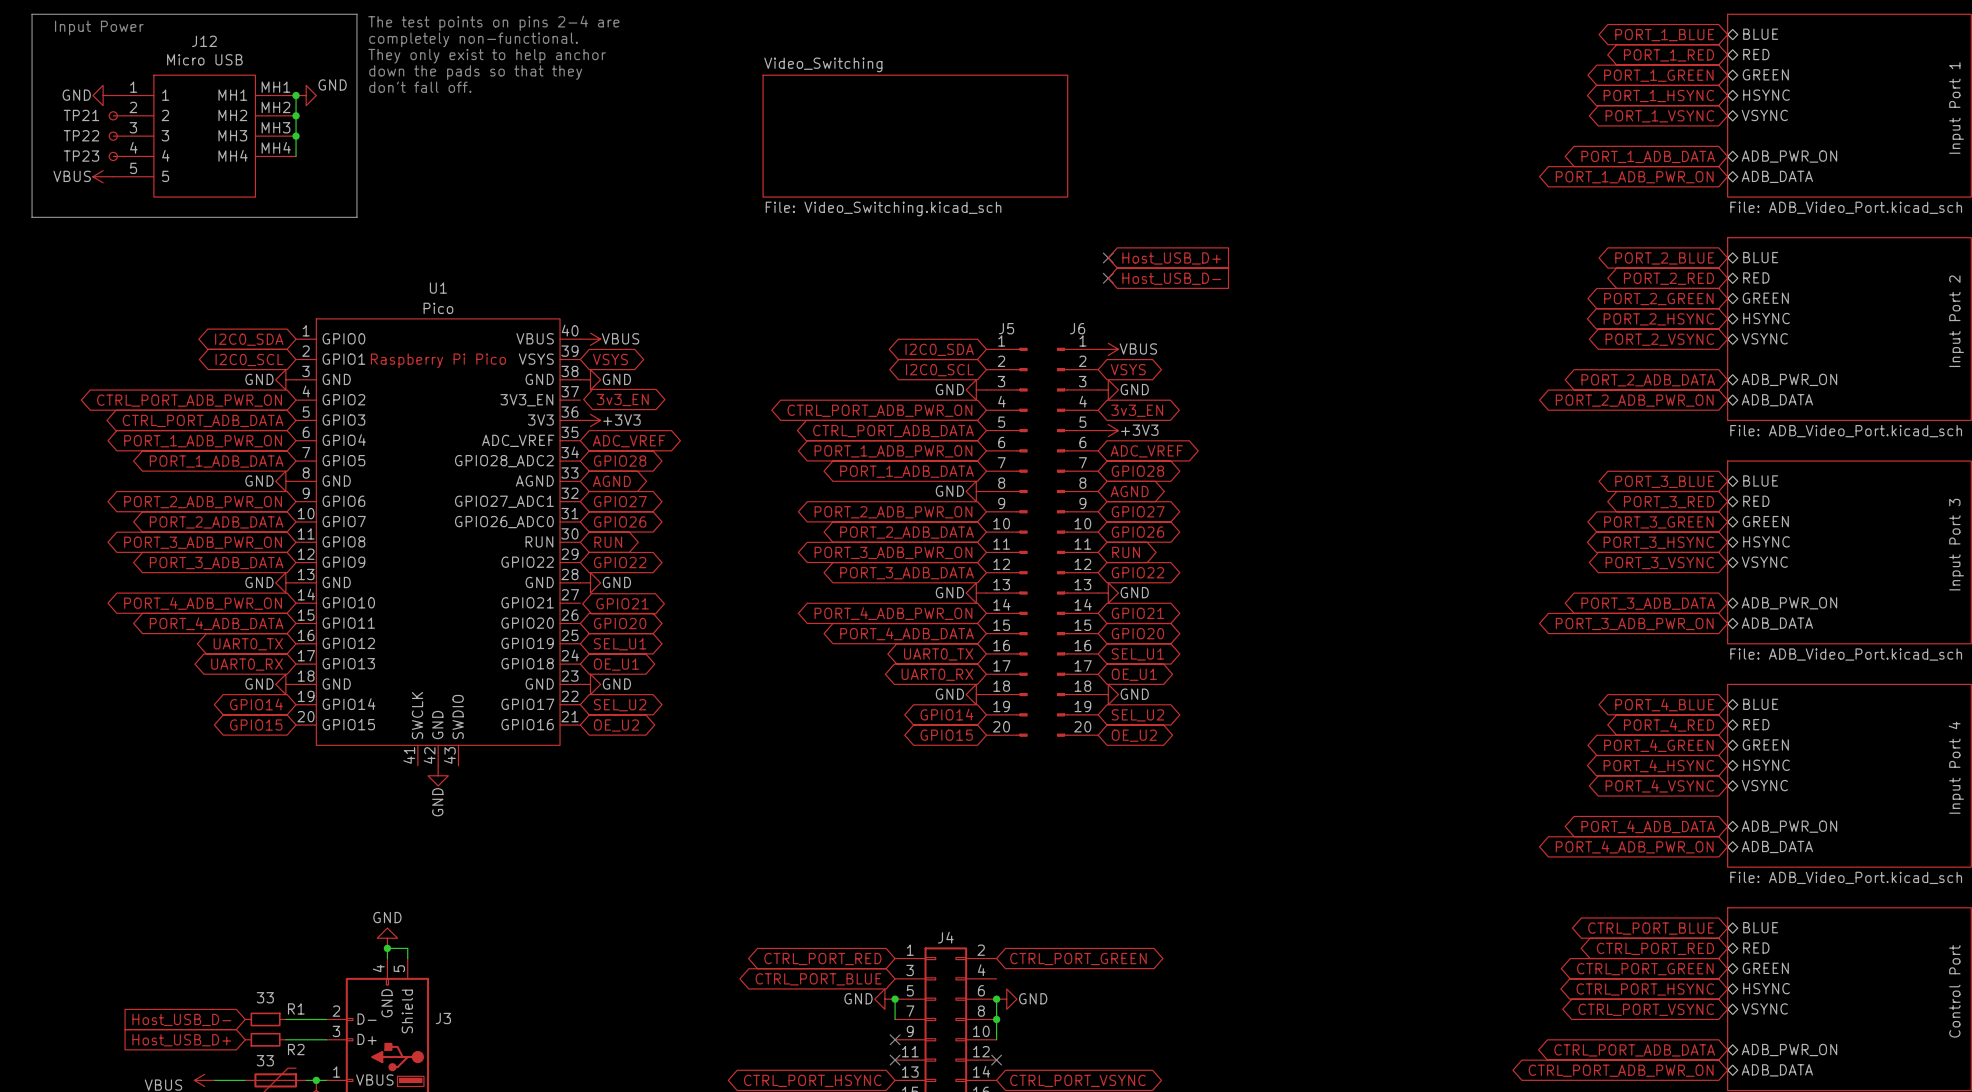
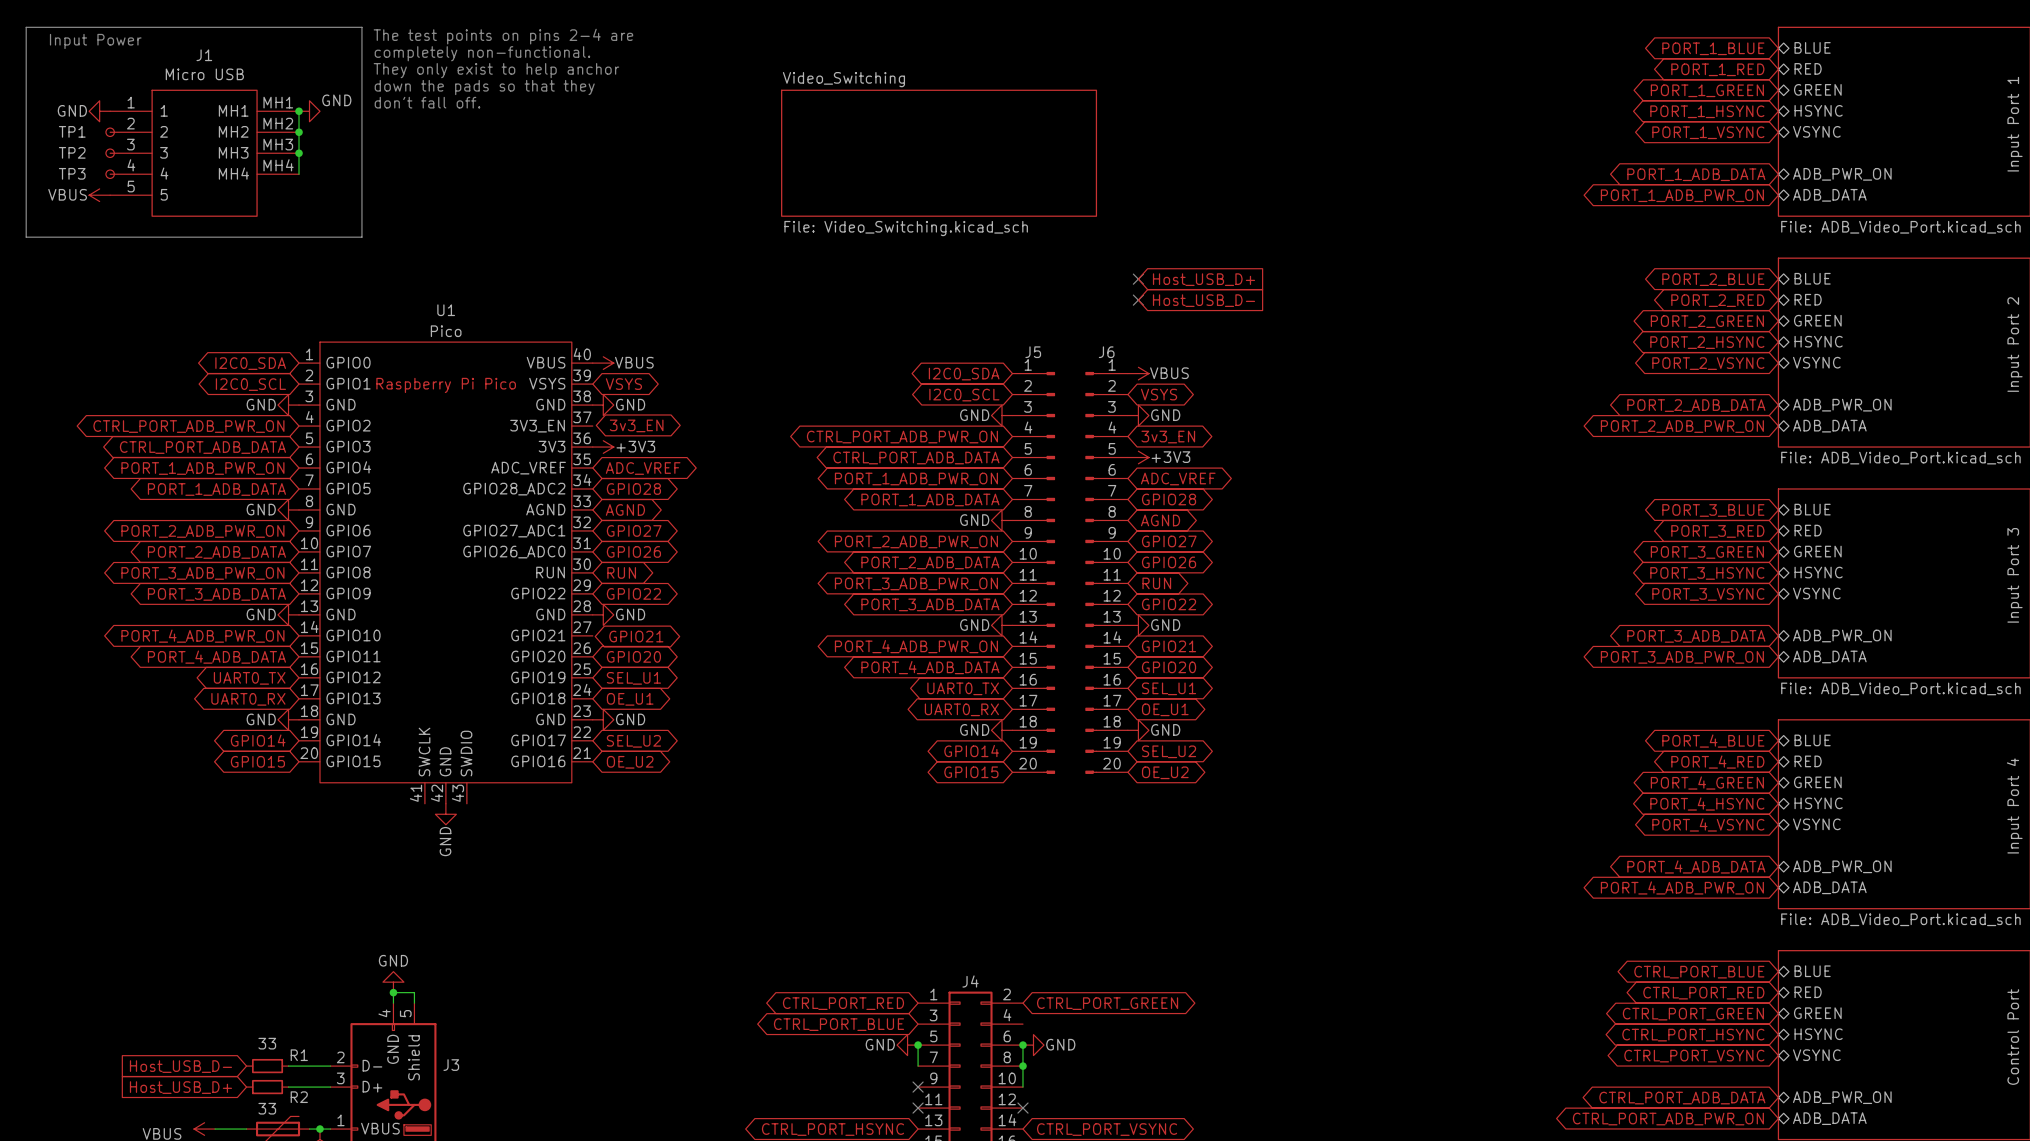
J12 name: J12 (204, 41) -> J1 (204, 55)
TP21 name: TP21 (81, 115) -> TP1 (72, 131)
TP22 name: TP22 (81, 135) -> TP2 (72, 152)
TP23 name: TP23 (81, 156) -> TP3 (72, 173)

